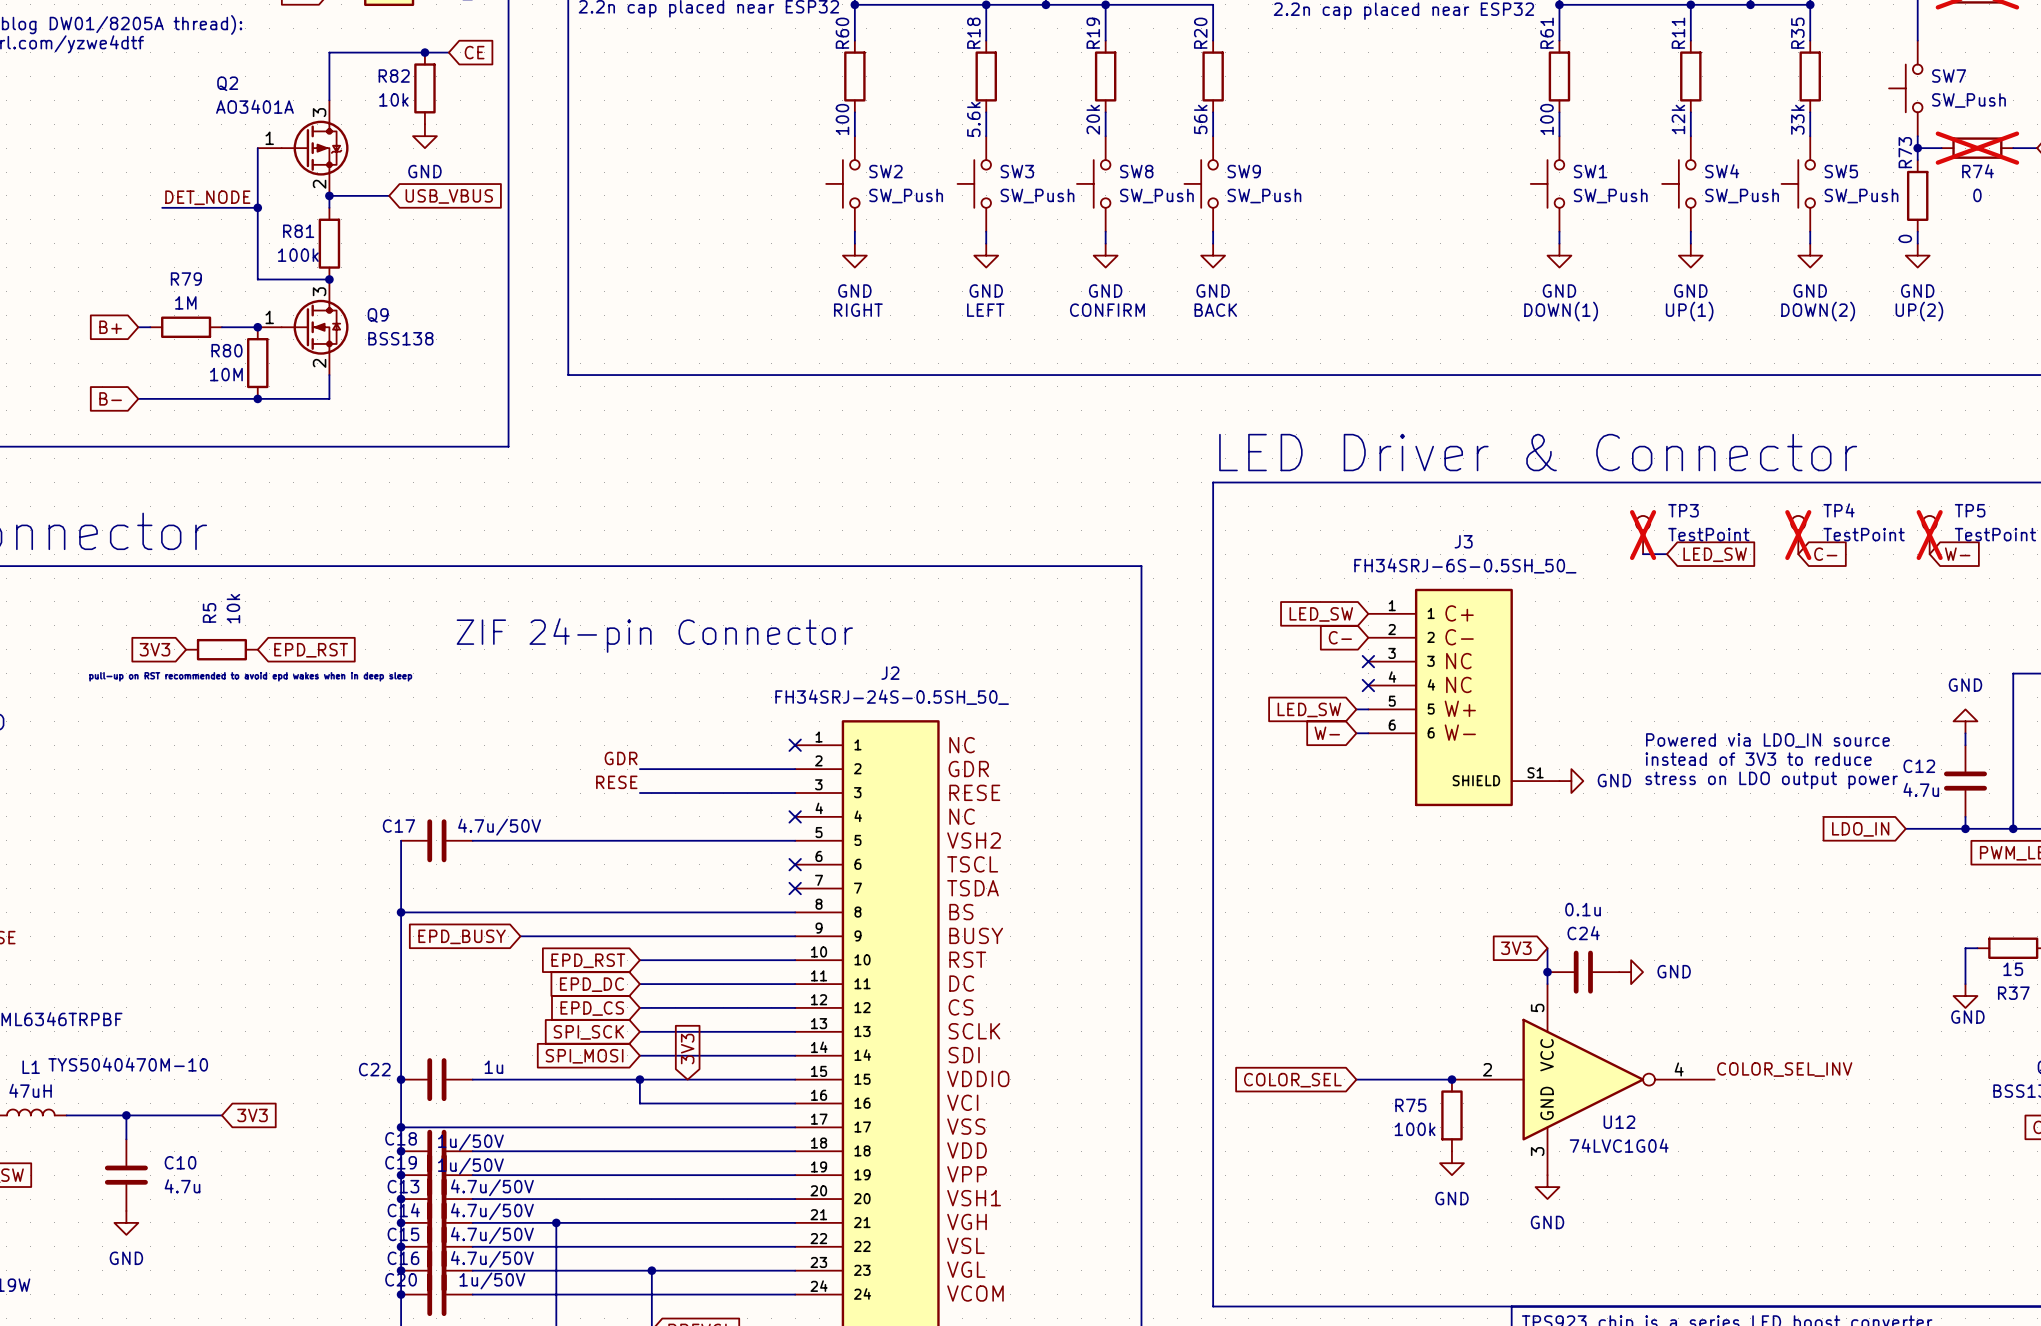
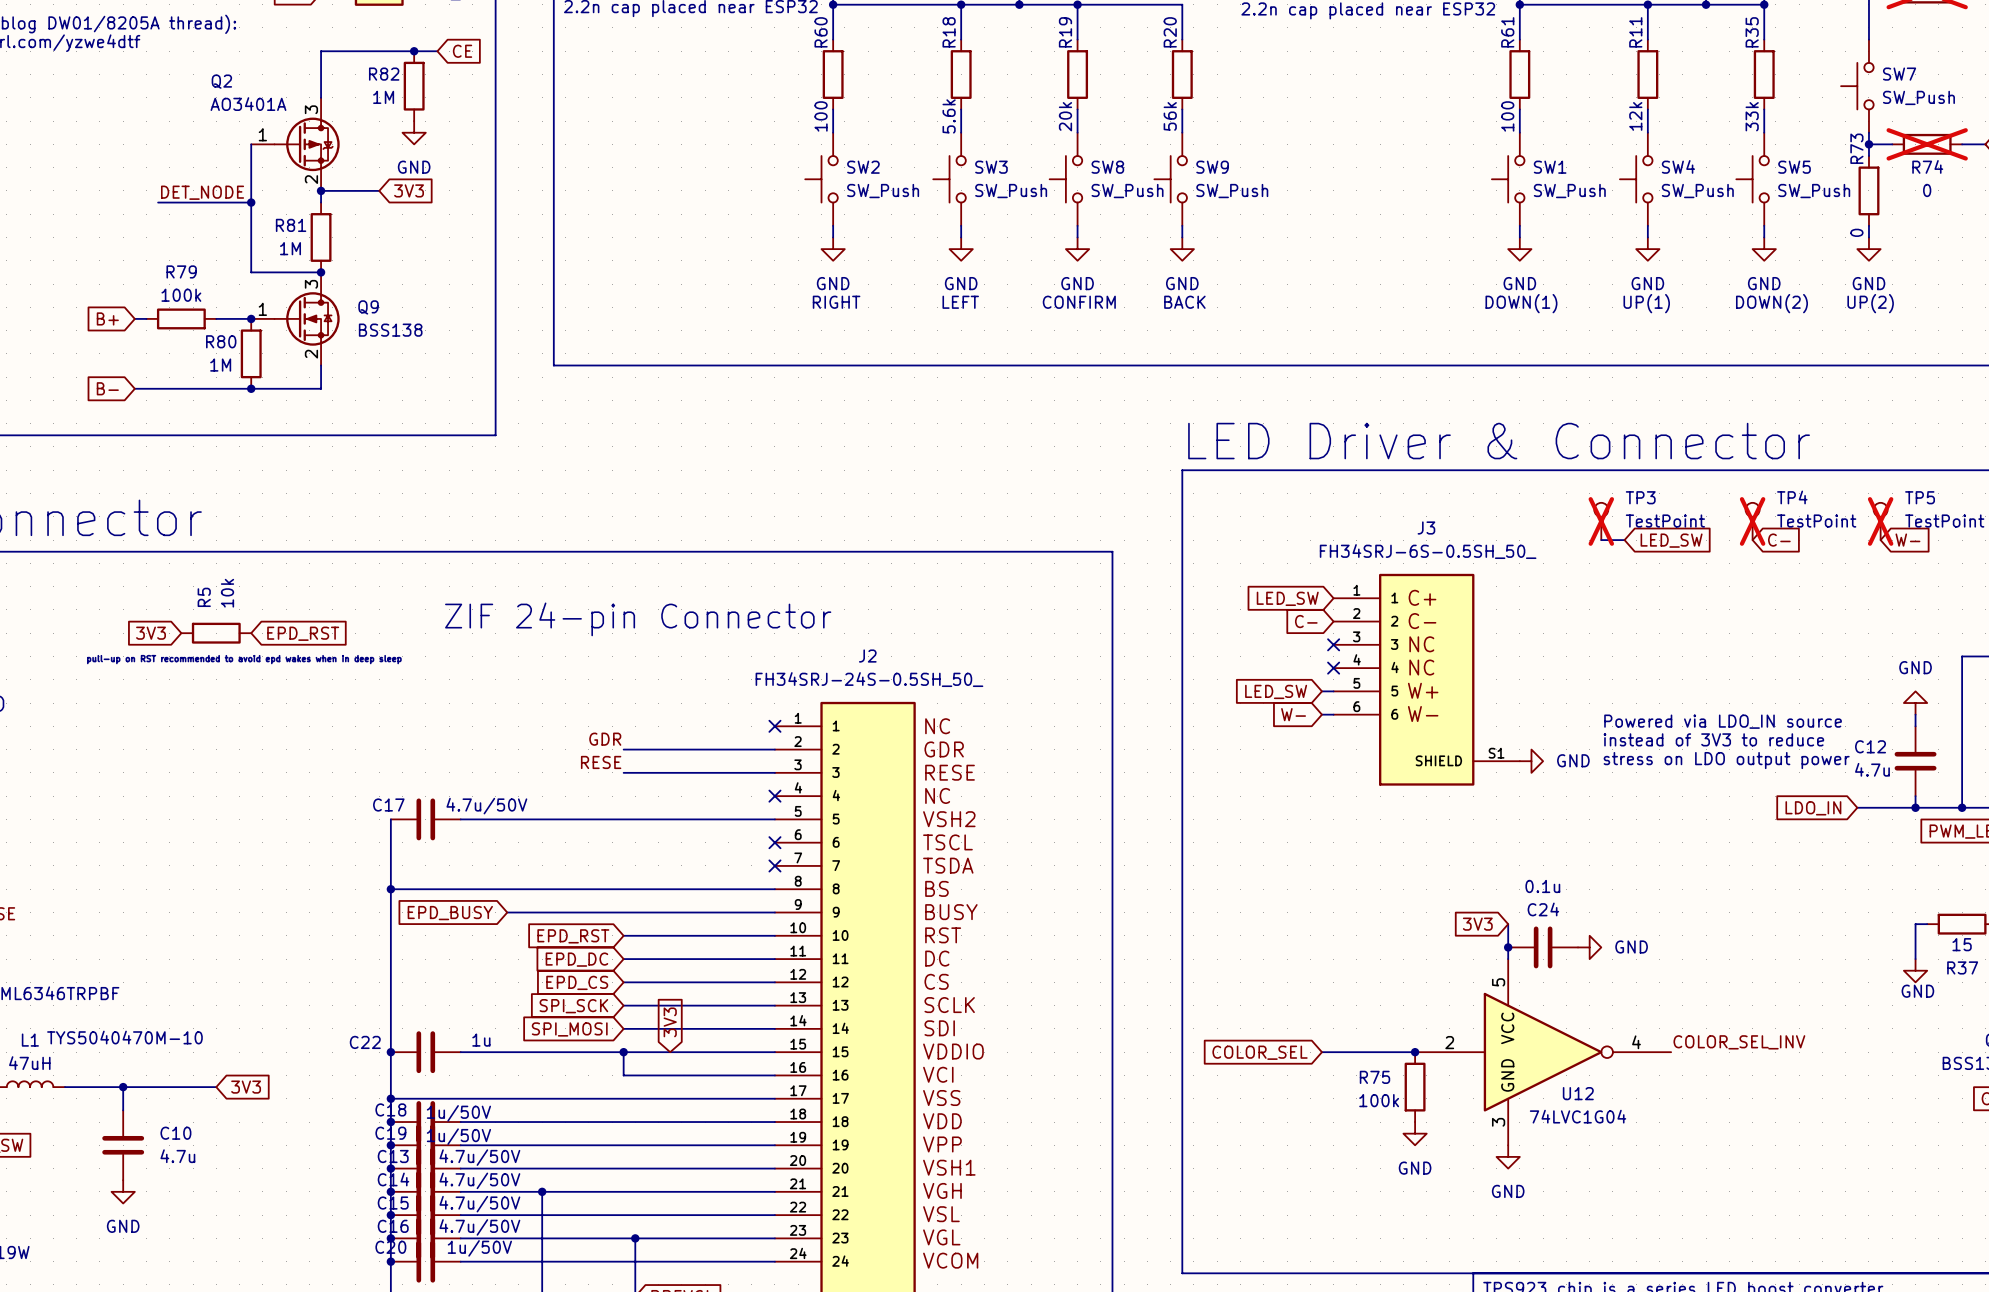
R82 value: 10k (393, 99) -> 1M (383, 97)
global label: USB_VBUS (449, 196) -> 3V3 (409, 190)
R81 value: 100k (298, 255) -> 1M (290, 248)
R79 value: 1M (185, 302) -> 100k (181, 295)
R80 value: 10M (226, 374) -> 1M (220, 365)

